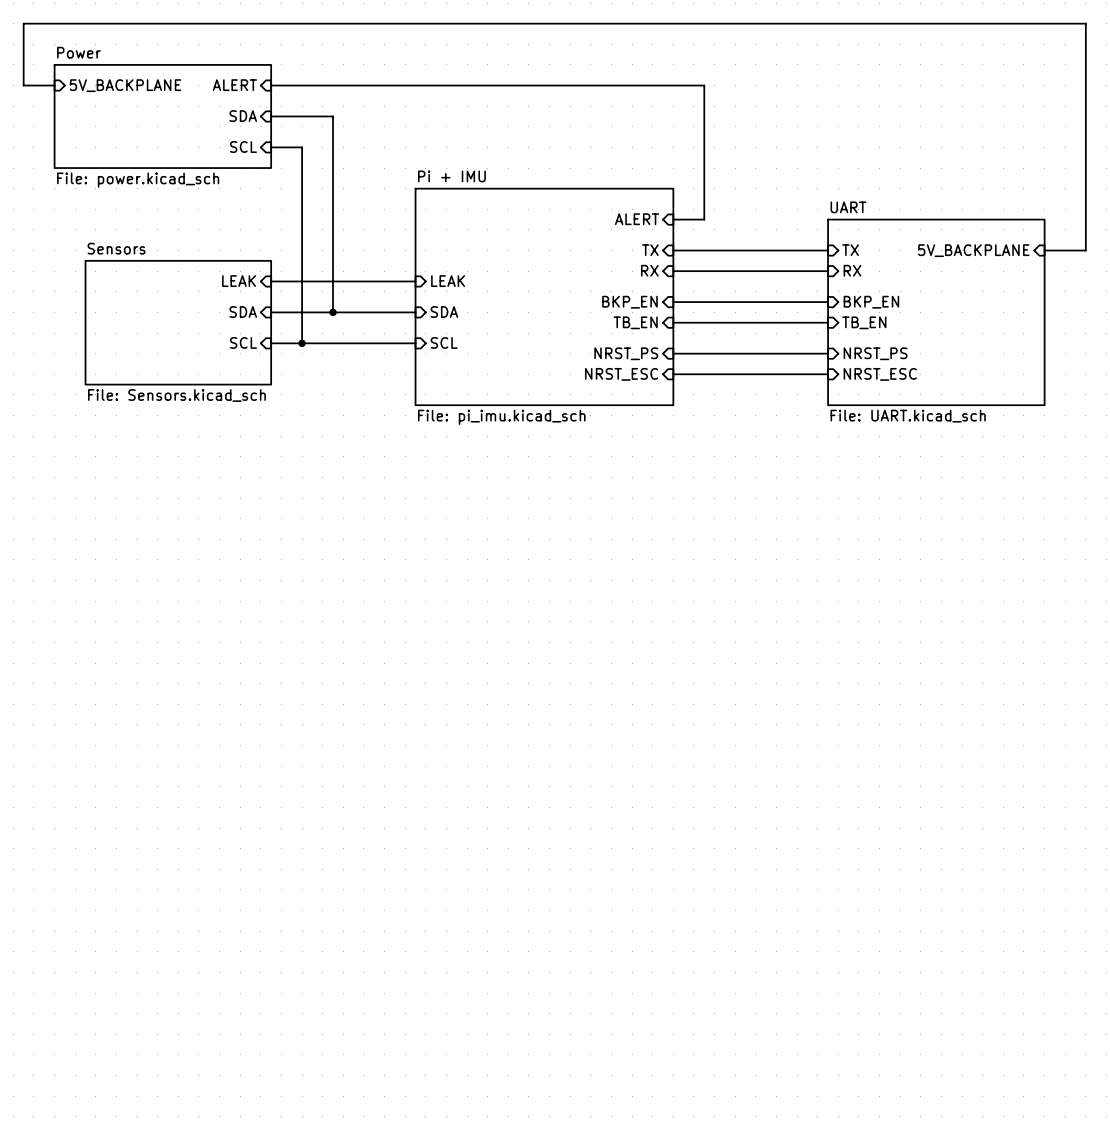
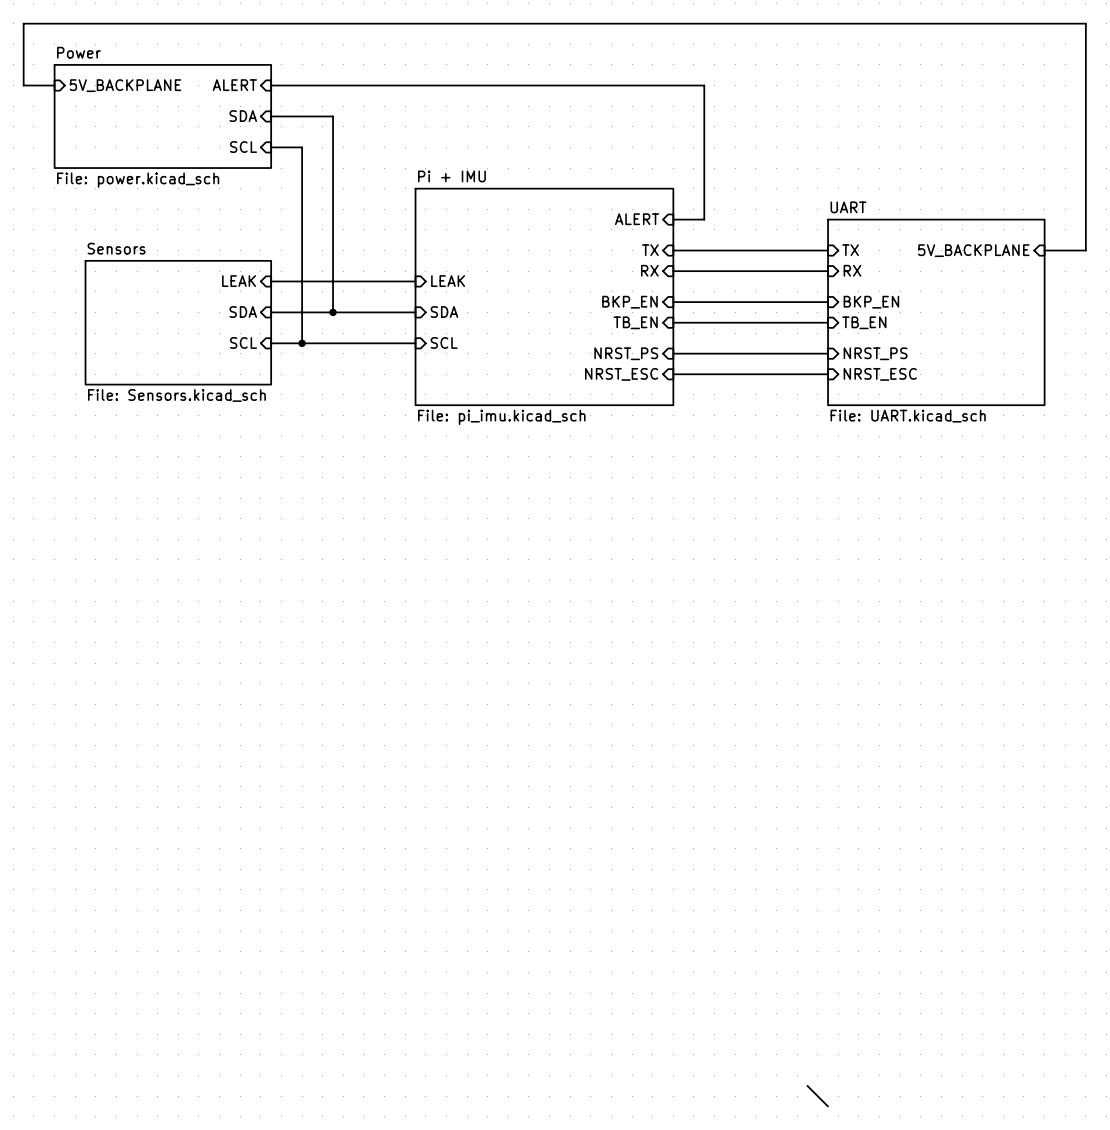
wire: none -> (807, 1085) (828, 1106)

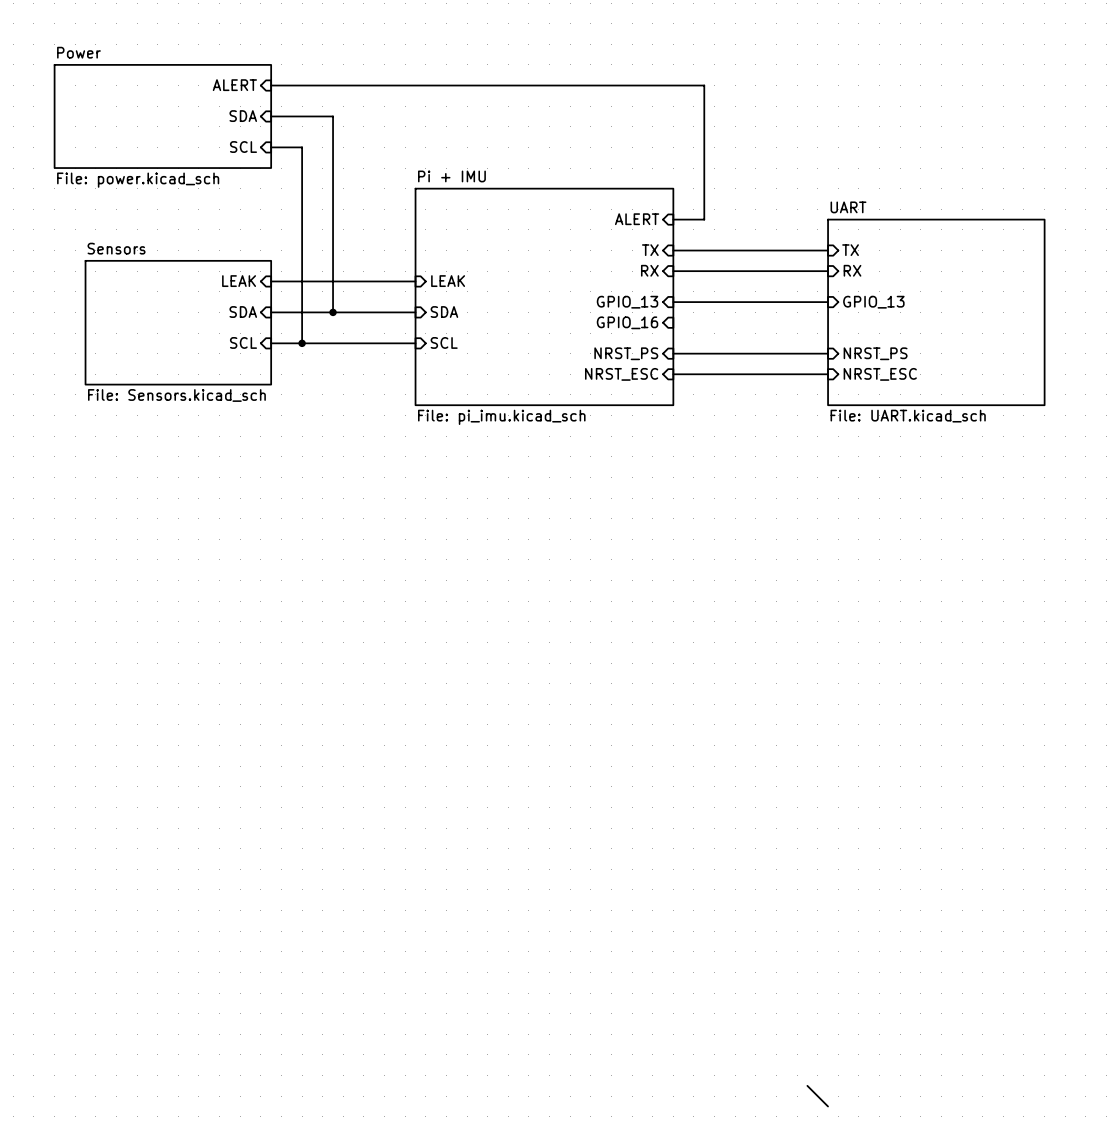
wire: (54, 85) (23, 85) (23, 23) (1085, 23) (1085, 250) (1044, 250) -> none
sheet pin: 5V_BACKPLANE (125, 85) -> none
sheet pin: 5V_BACKPLANE (973, 250) -> none
sheet pin: BKP_EN (629, 302) -> GPIO_13 (627, 302)
sheet pin: BKP_EN (871, 302) -> GPIO_13 (873, 302)
sheet pin: TB_EN (635, 322) -> GPIO_16 (627, 322)
wire: (673, 322) (828, 322) -> none
sheet pin: TB_EN (864, 322) -> none

